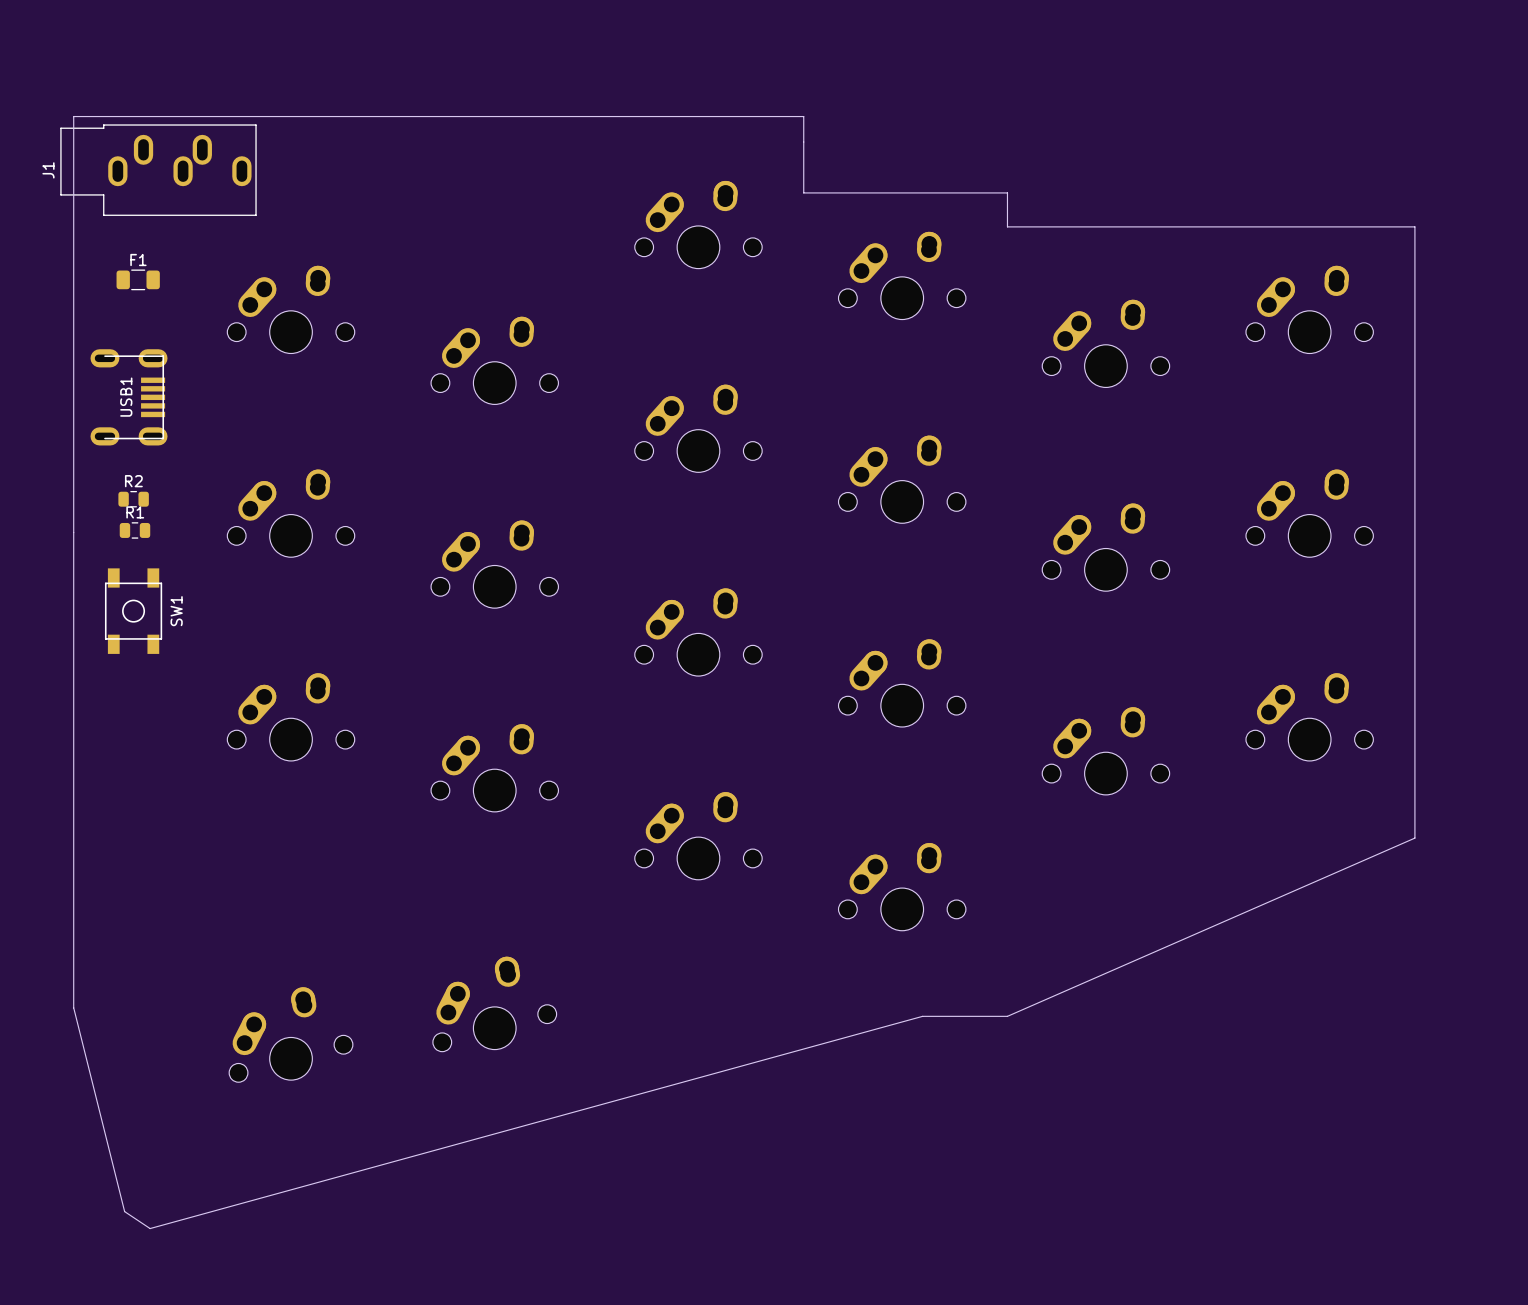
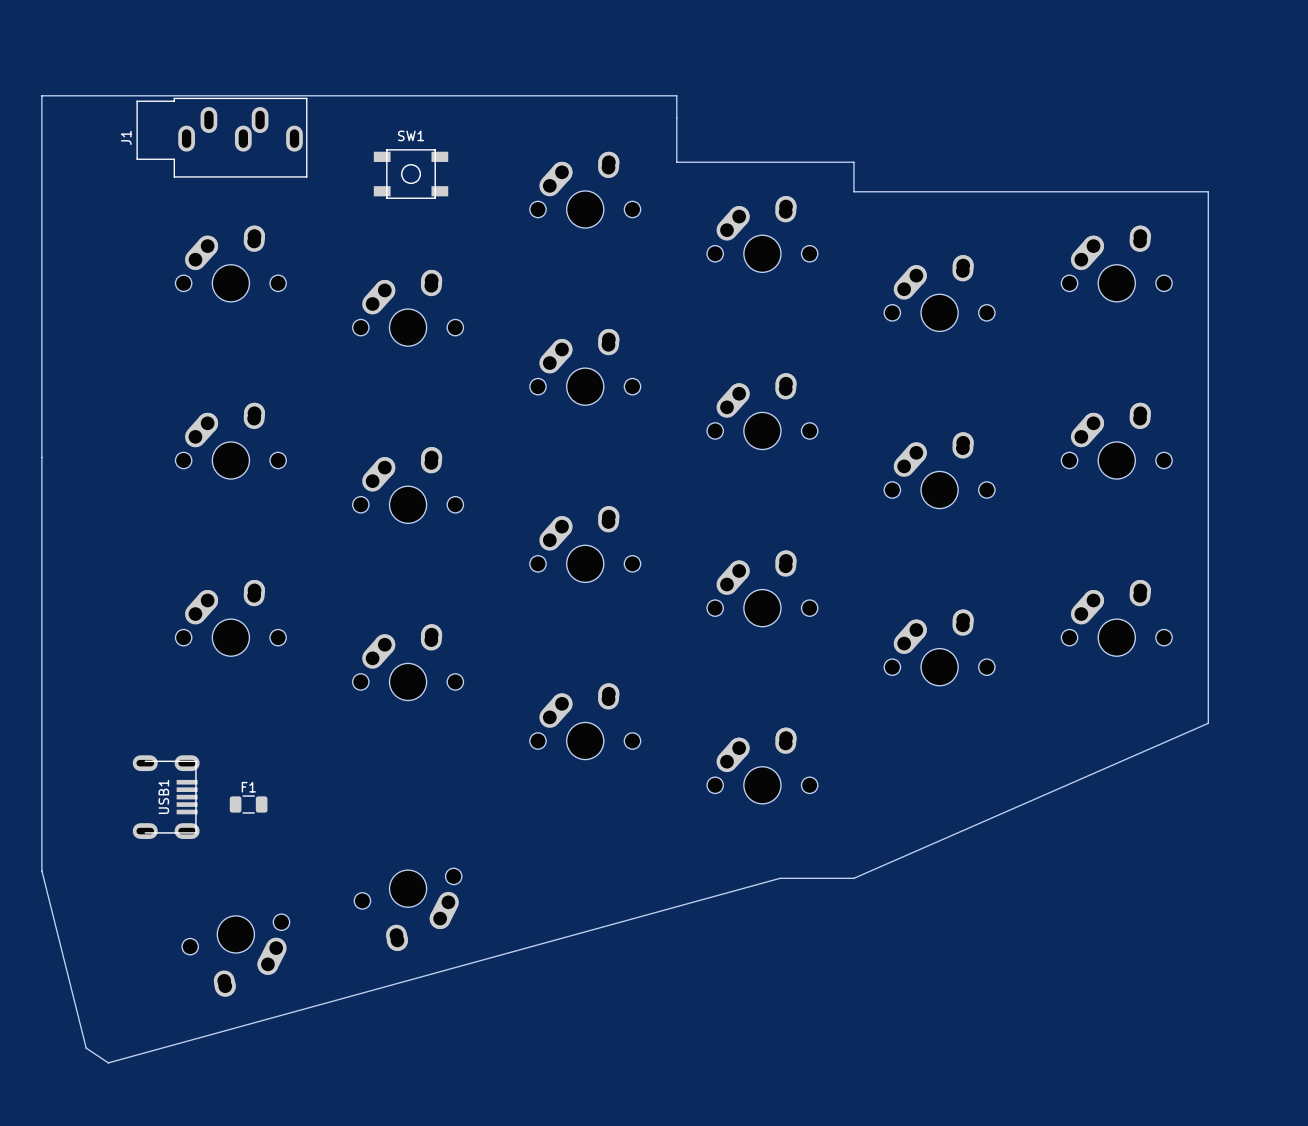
J1 position: (158, 170) -> (221, 137)
F1 position: (138, 279) -> (248, 804)
USB1 position: (129, 397) -> (166, 797)
R2: (133, 499) -> none
R1: (134, 530) -> none
SW1 rotation: 0° (133, 611) -> 90° clockwise (411, 174)
SW1 position: (133, 611) -> (411, 174)
SW1 name position: SW1 (176, 611) -> SW1 (411, 135)
part rotation: 0° (494, 1004) -> 180° (408, 909)
part rotation: 0° (291, 1034) -> 180° (235, 955)

